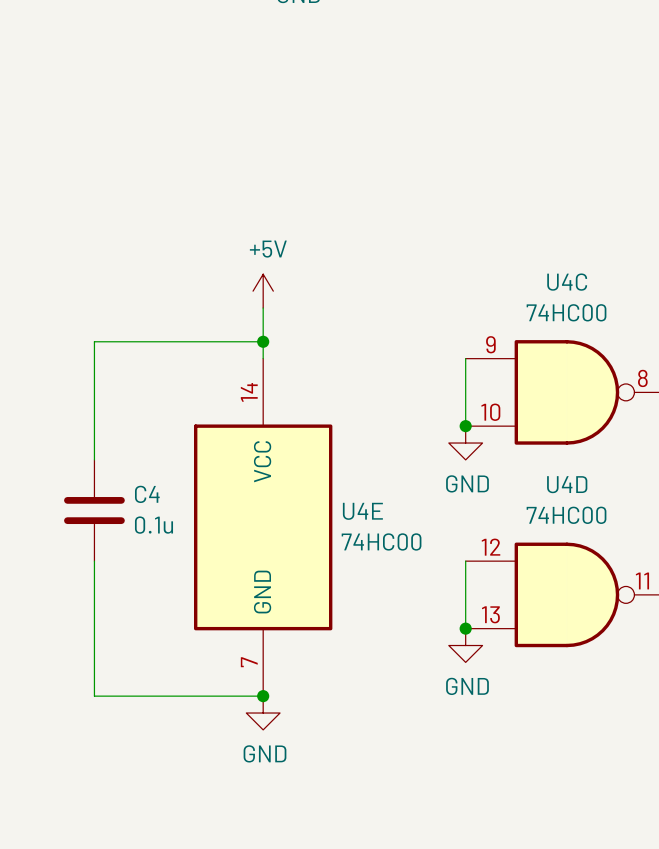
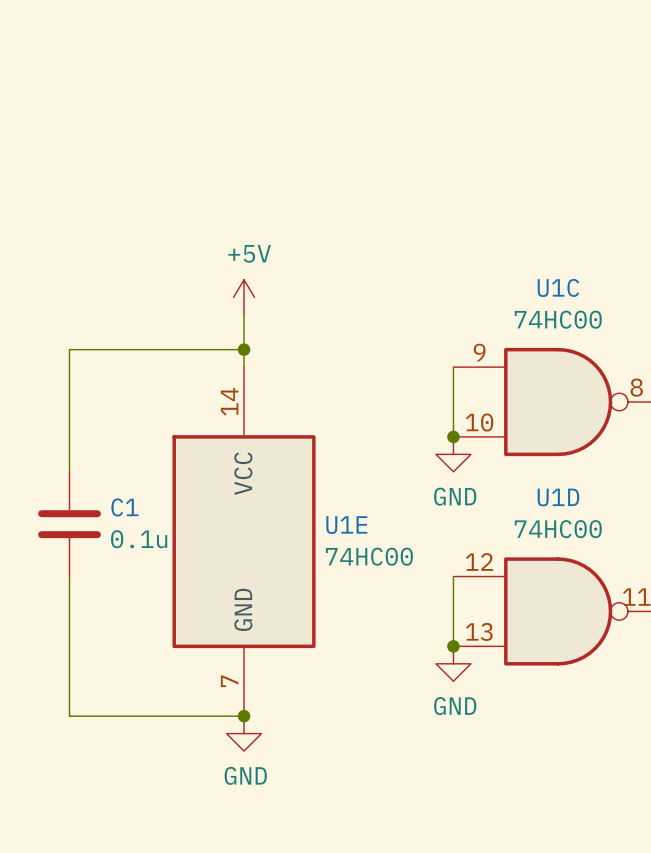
U4C name: U4C (567, 282) -> U1C (558, 287)
U4D name: U4D (567, 484) -> U1D (558, 497)
C4 name: C4 (147, 494) -> C1 (124, 507)
U4E name: U4E (362, 511) -> U1E (346, 525)

